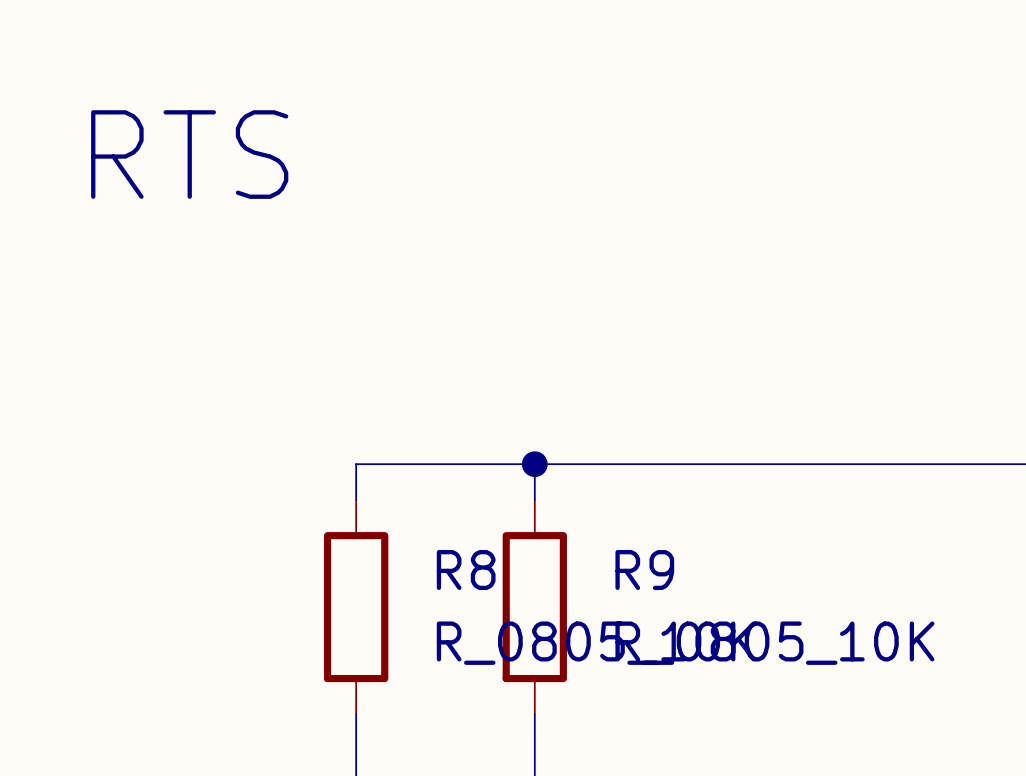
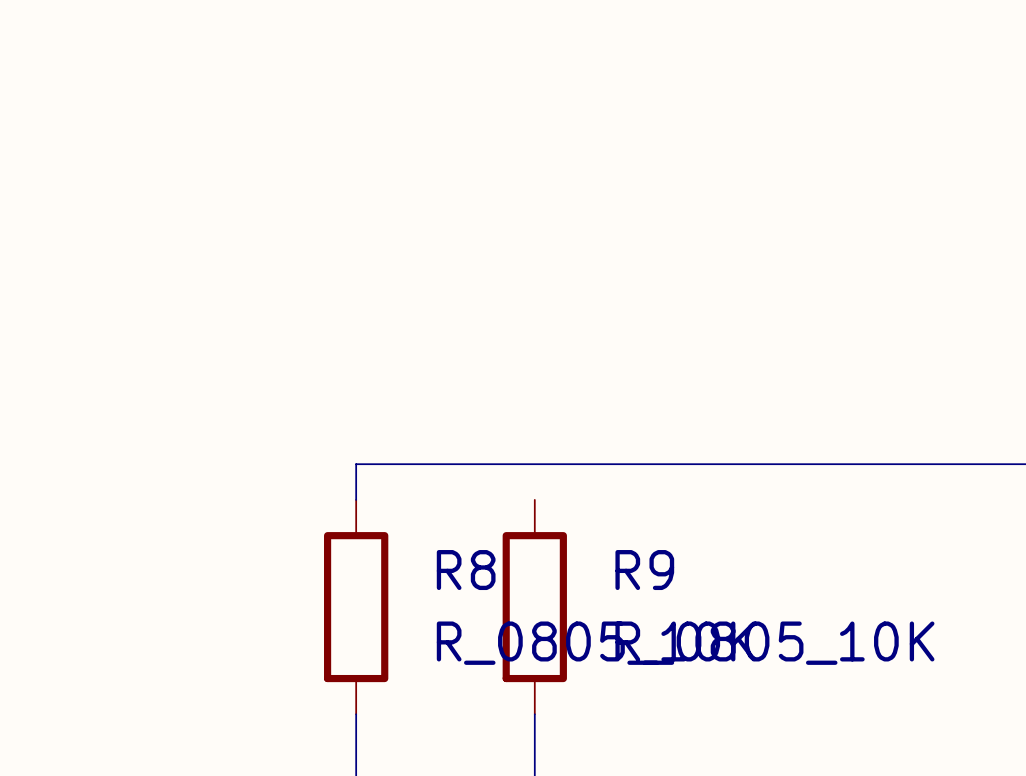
text: RTS (189, 154) -> none
wire: (534, 464) (534, 499) -> none
junction: (534, 464) -> none

